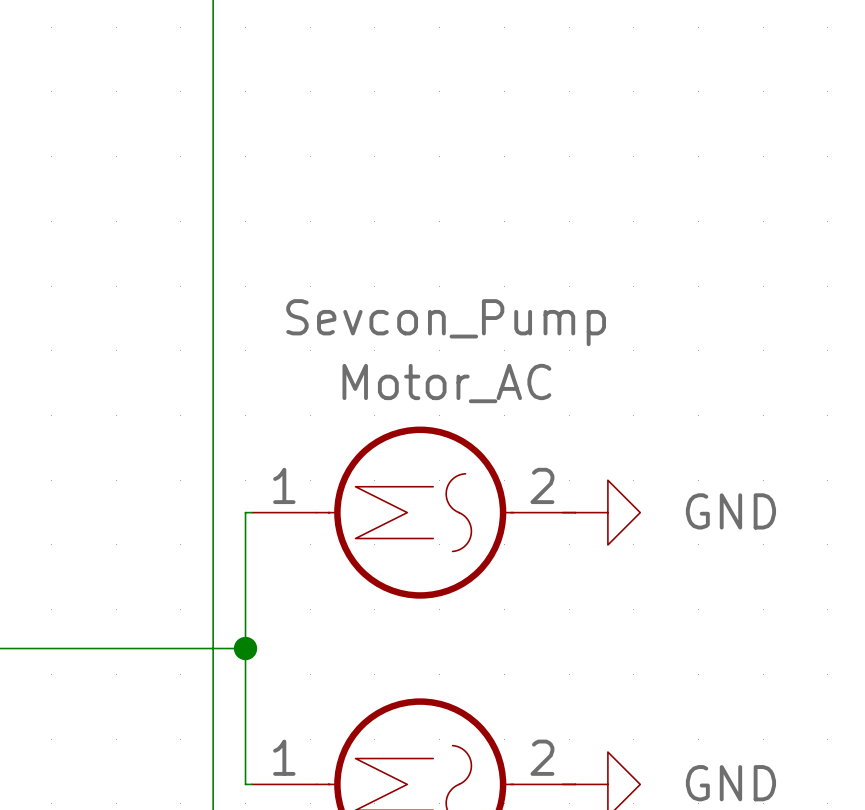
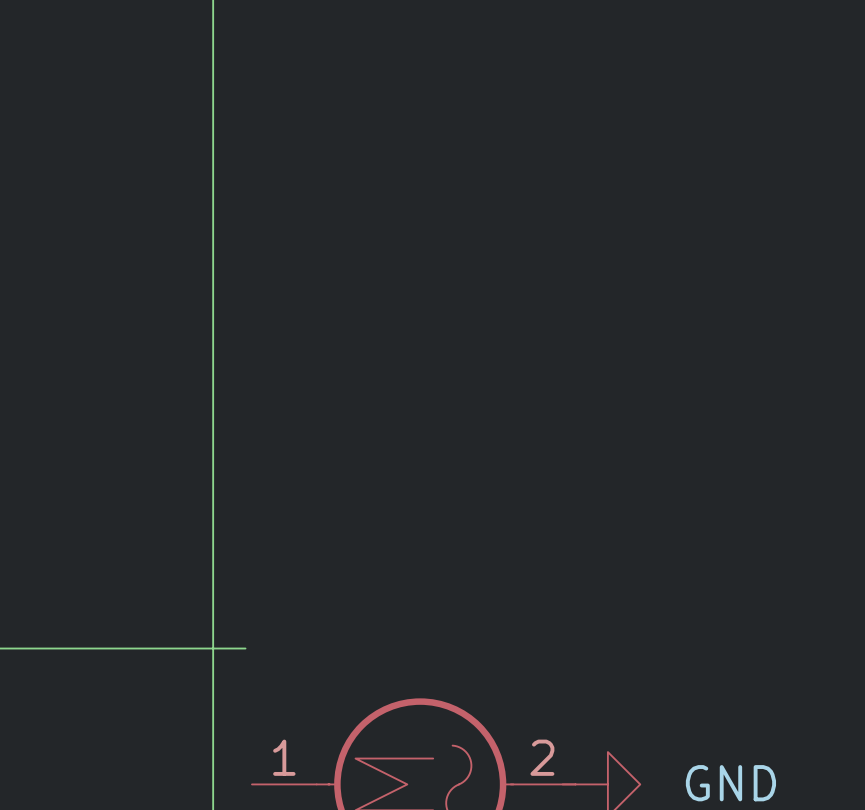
wire: (251, 512) (245, 512) (245, 784) (251, 784) -> none
Sevcon_Pump: Motor_AC (413, 512) -> none
power symbol: GND (607, 512) -> none
junction: (245, 648) -> none

